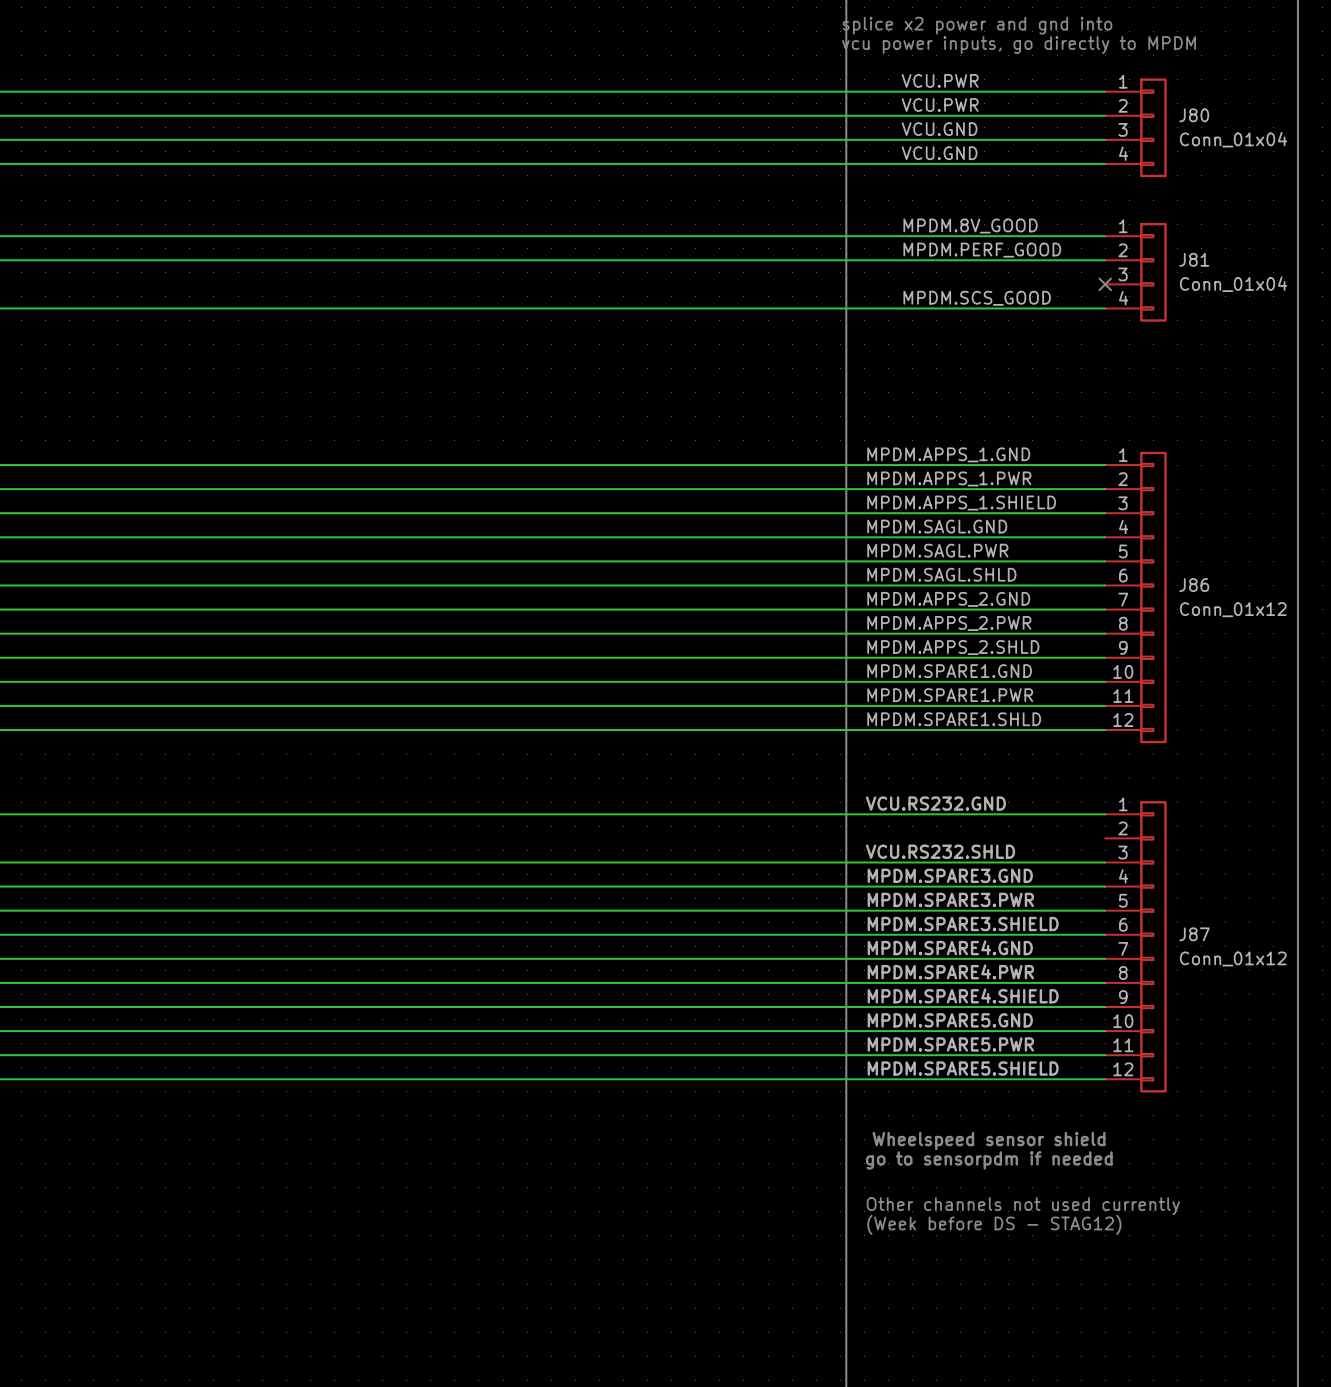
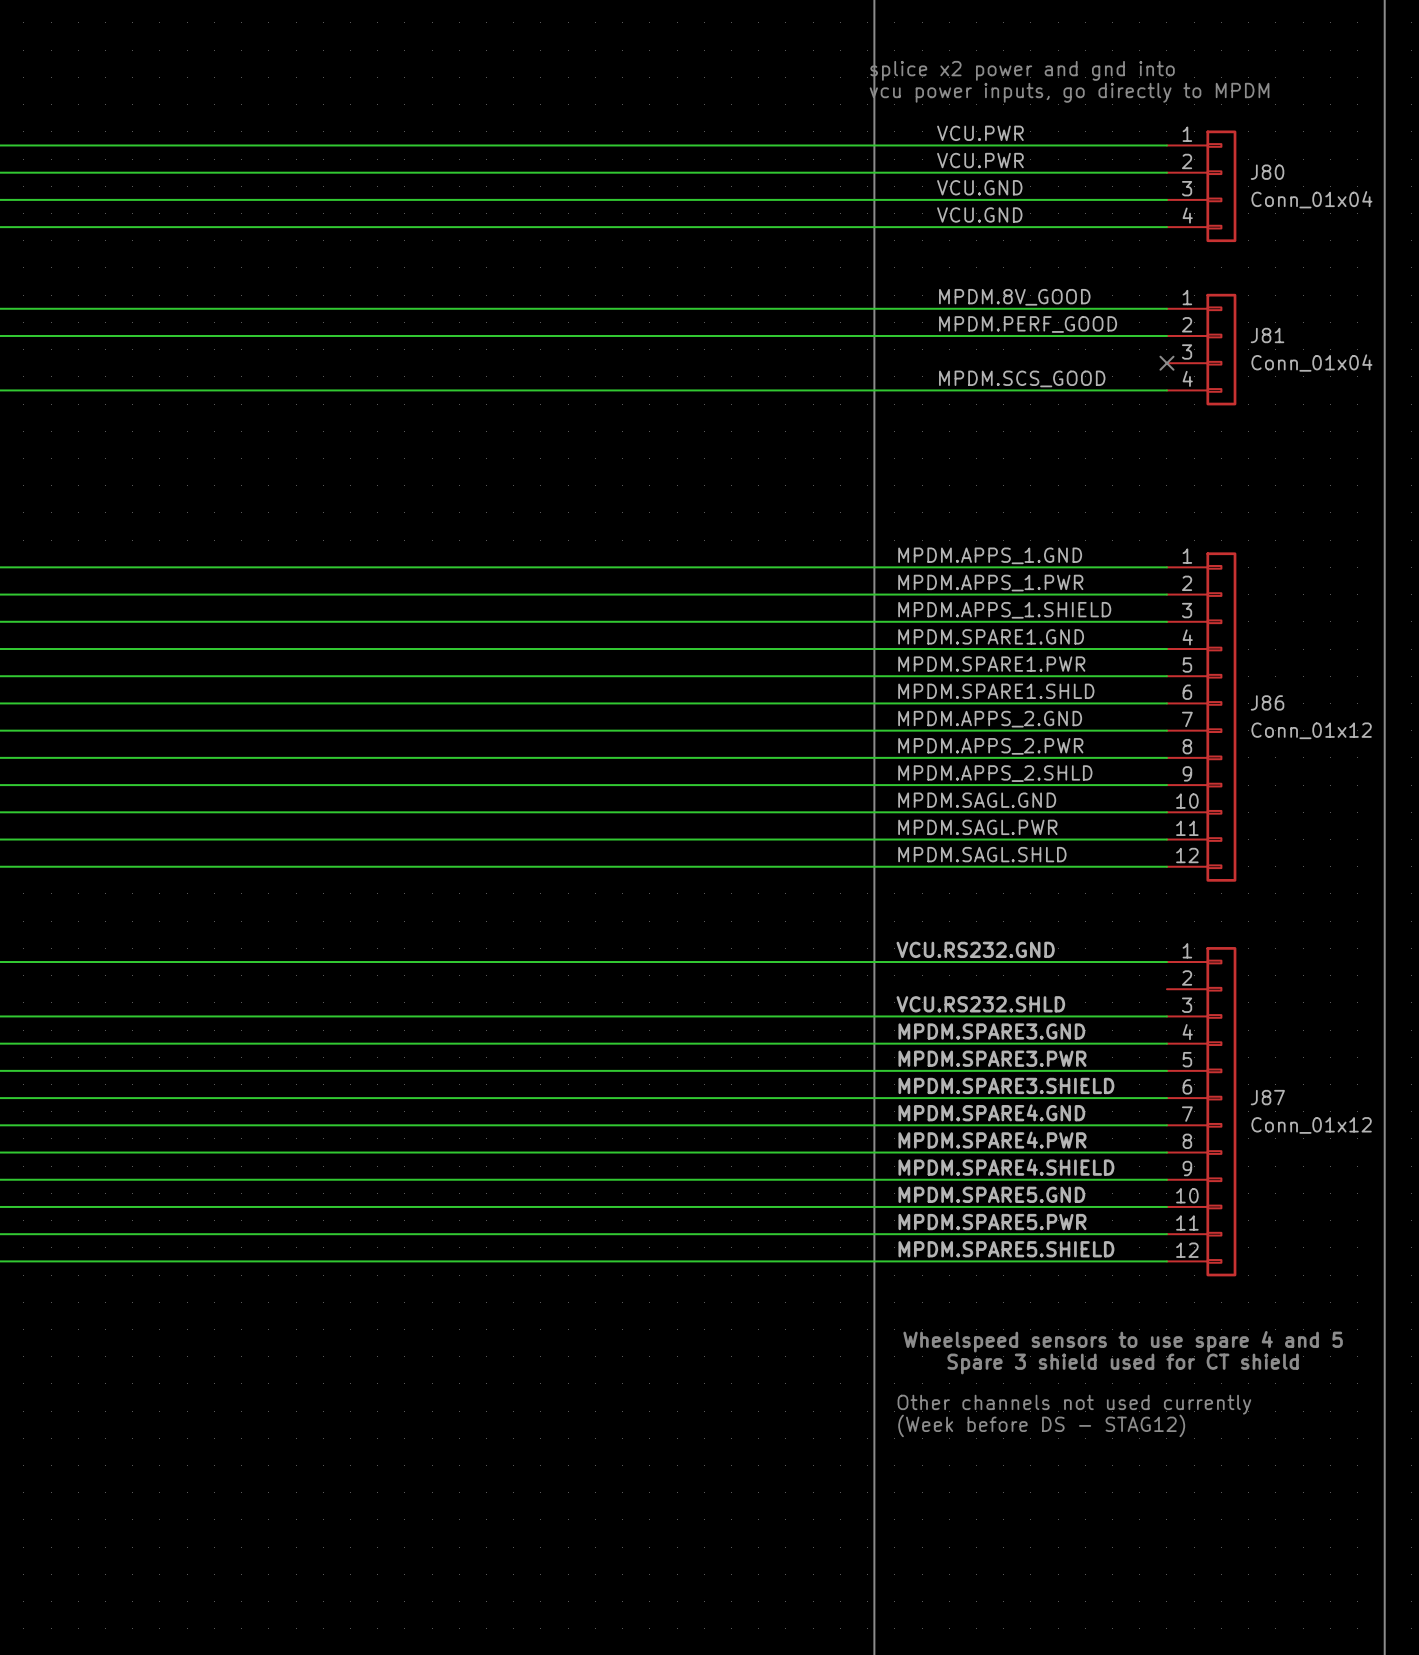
label: MPDM.SAGL.GND (937, 526) -> MPDM.SPARE1.GND (991, 636)
label: MPDM.SAGL.PWR (937, 550) -> MPDM.SPARE1.PWR (991, 664)
label: MPDM.SAGL.SHLD (941, 574) -> MPDM.SPARE1.SHLD (996, 691)
label: MPDM.SPARE1.GND (949, 671) -> MPDM.SAGL.GND (977, 800)
label: MPDM.SPARE1.PWR (950, 695) -> MPDM.SAGL.PWR (977, 827)
label: MPDM.SPARE1.SHLD (954, 719) -> MPDM.SAGL.SHLD (982, 854)
text: Wheelspeed sensor shield (989, 1141) -> Wheelspeed sensors to use spare 4 and 5 (1123, 1341)
text: go to sensorpdm if needed (989, 1160) -> none
text: none -> Spare 3 shield used for CT shield (1123, 1363)

